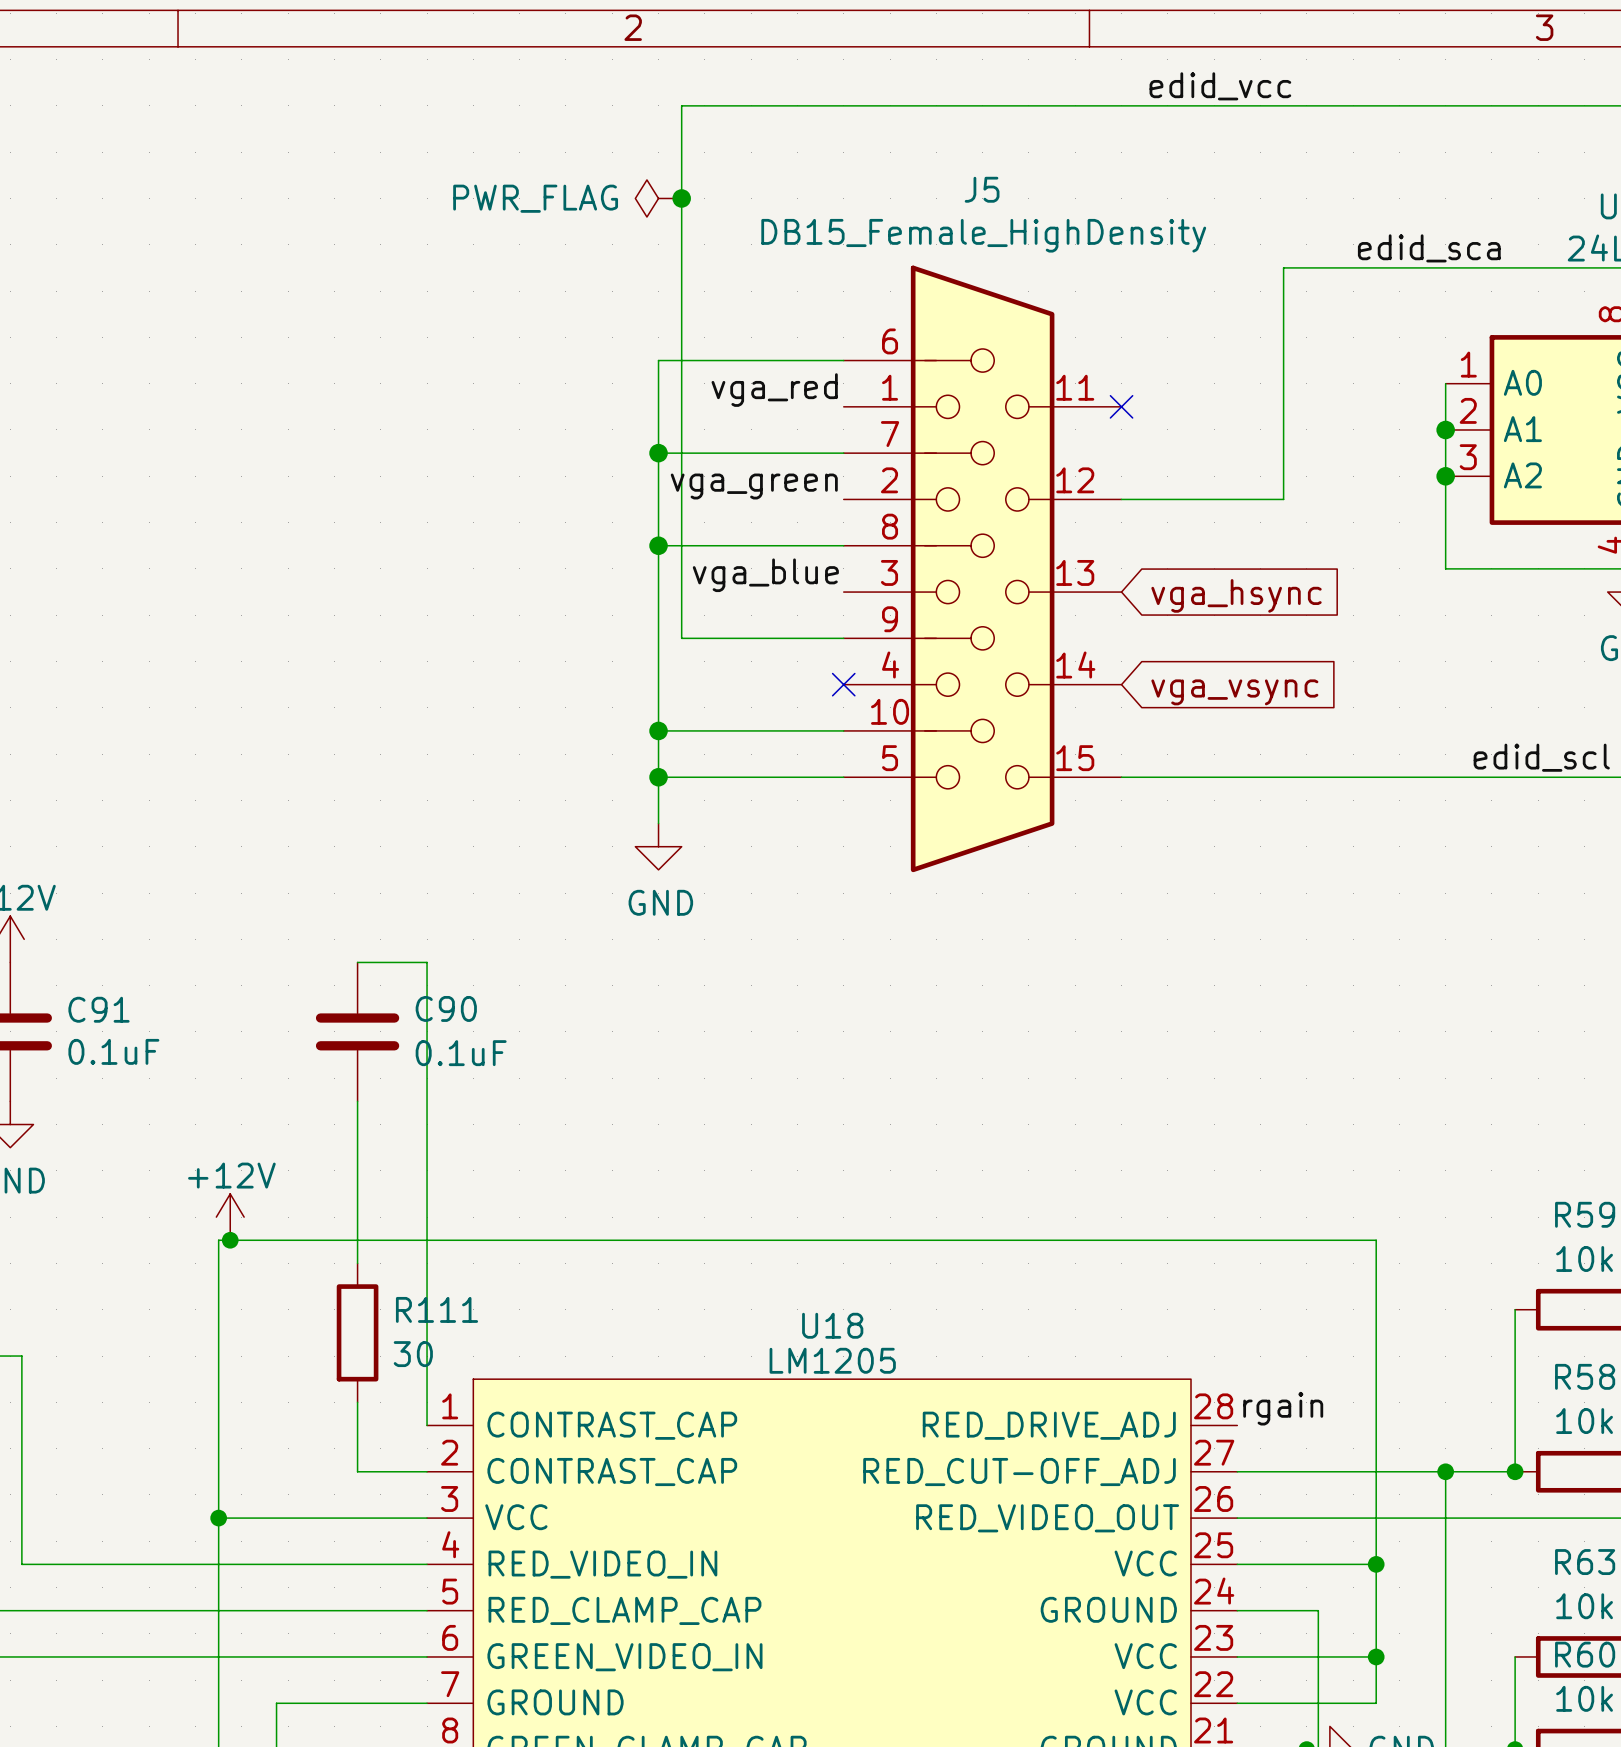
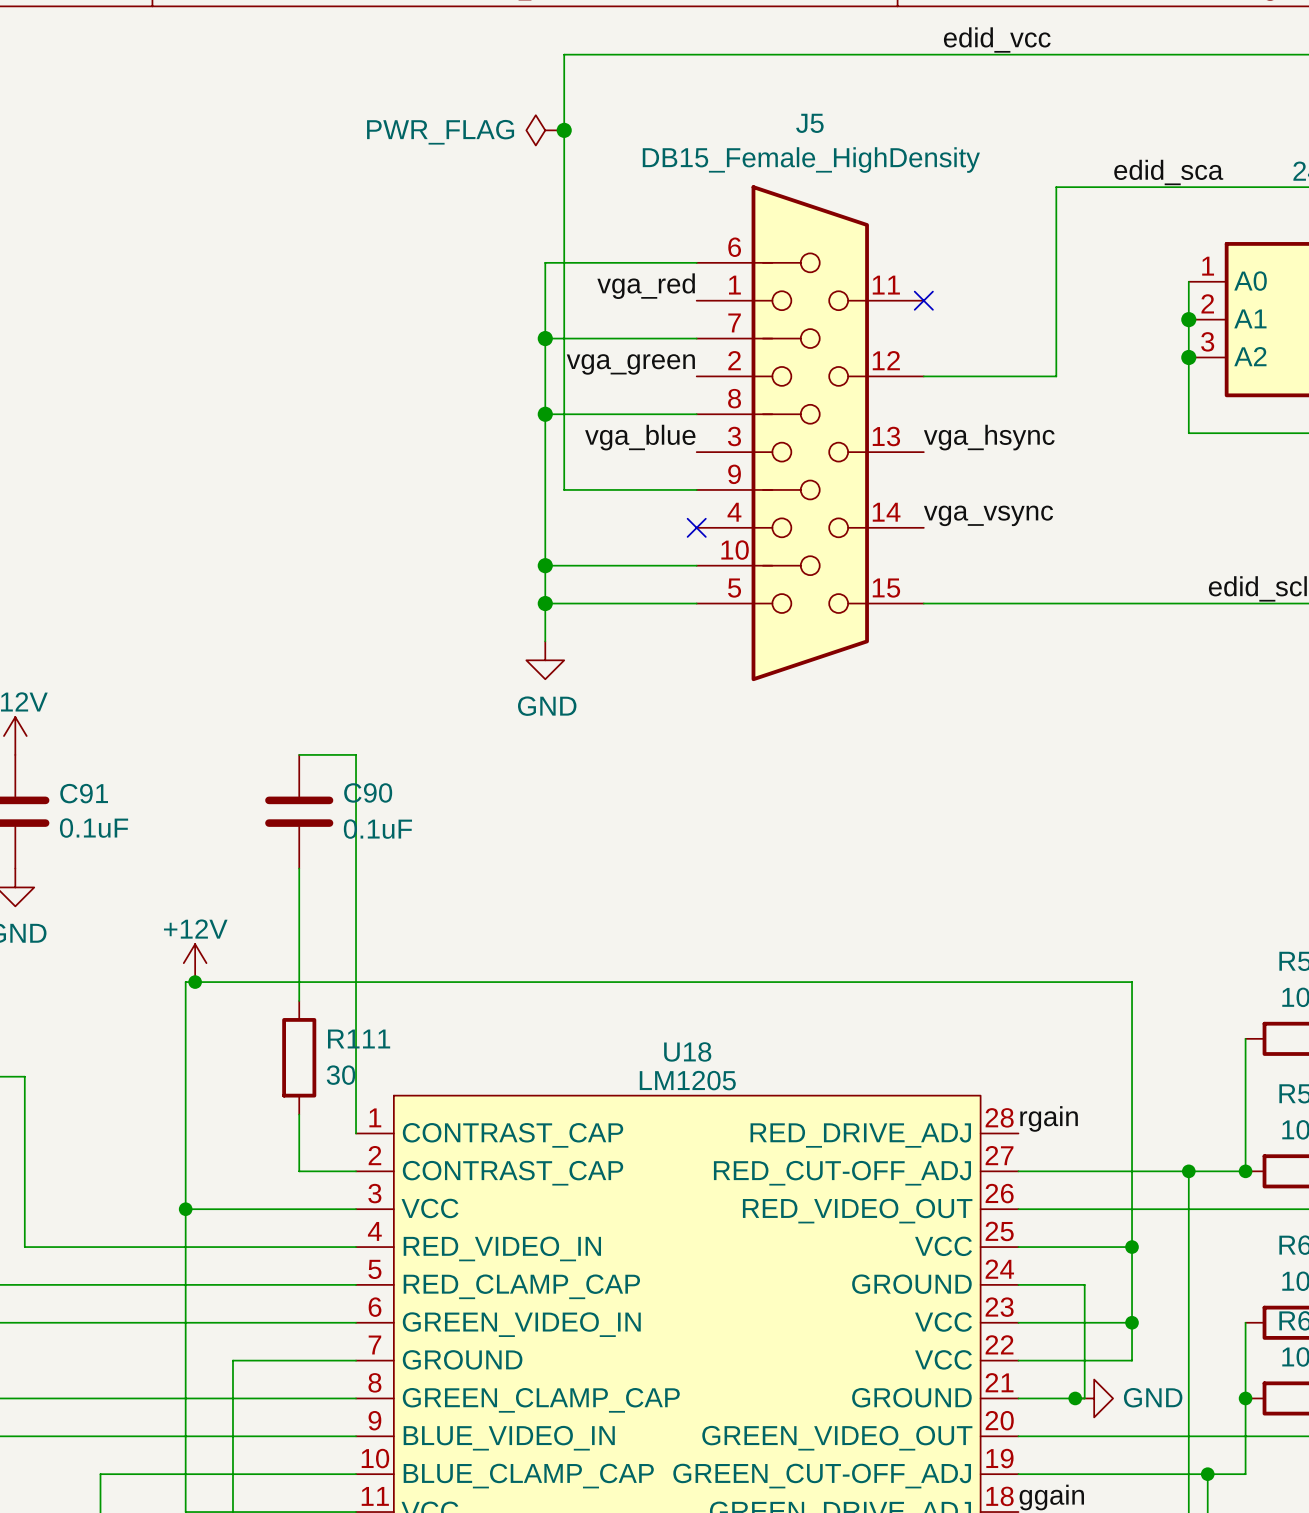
label: none -> vga_hsync (989, 437)
global label: vga_hsync (1236, 595) -> none
label: none -> vga_vsync (988, 515)
global label: vga_vsync (1234, 692) -> none

